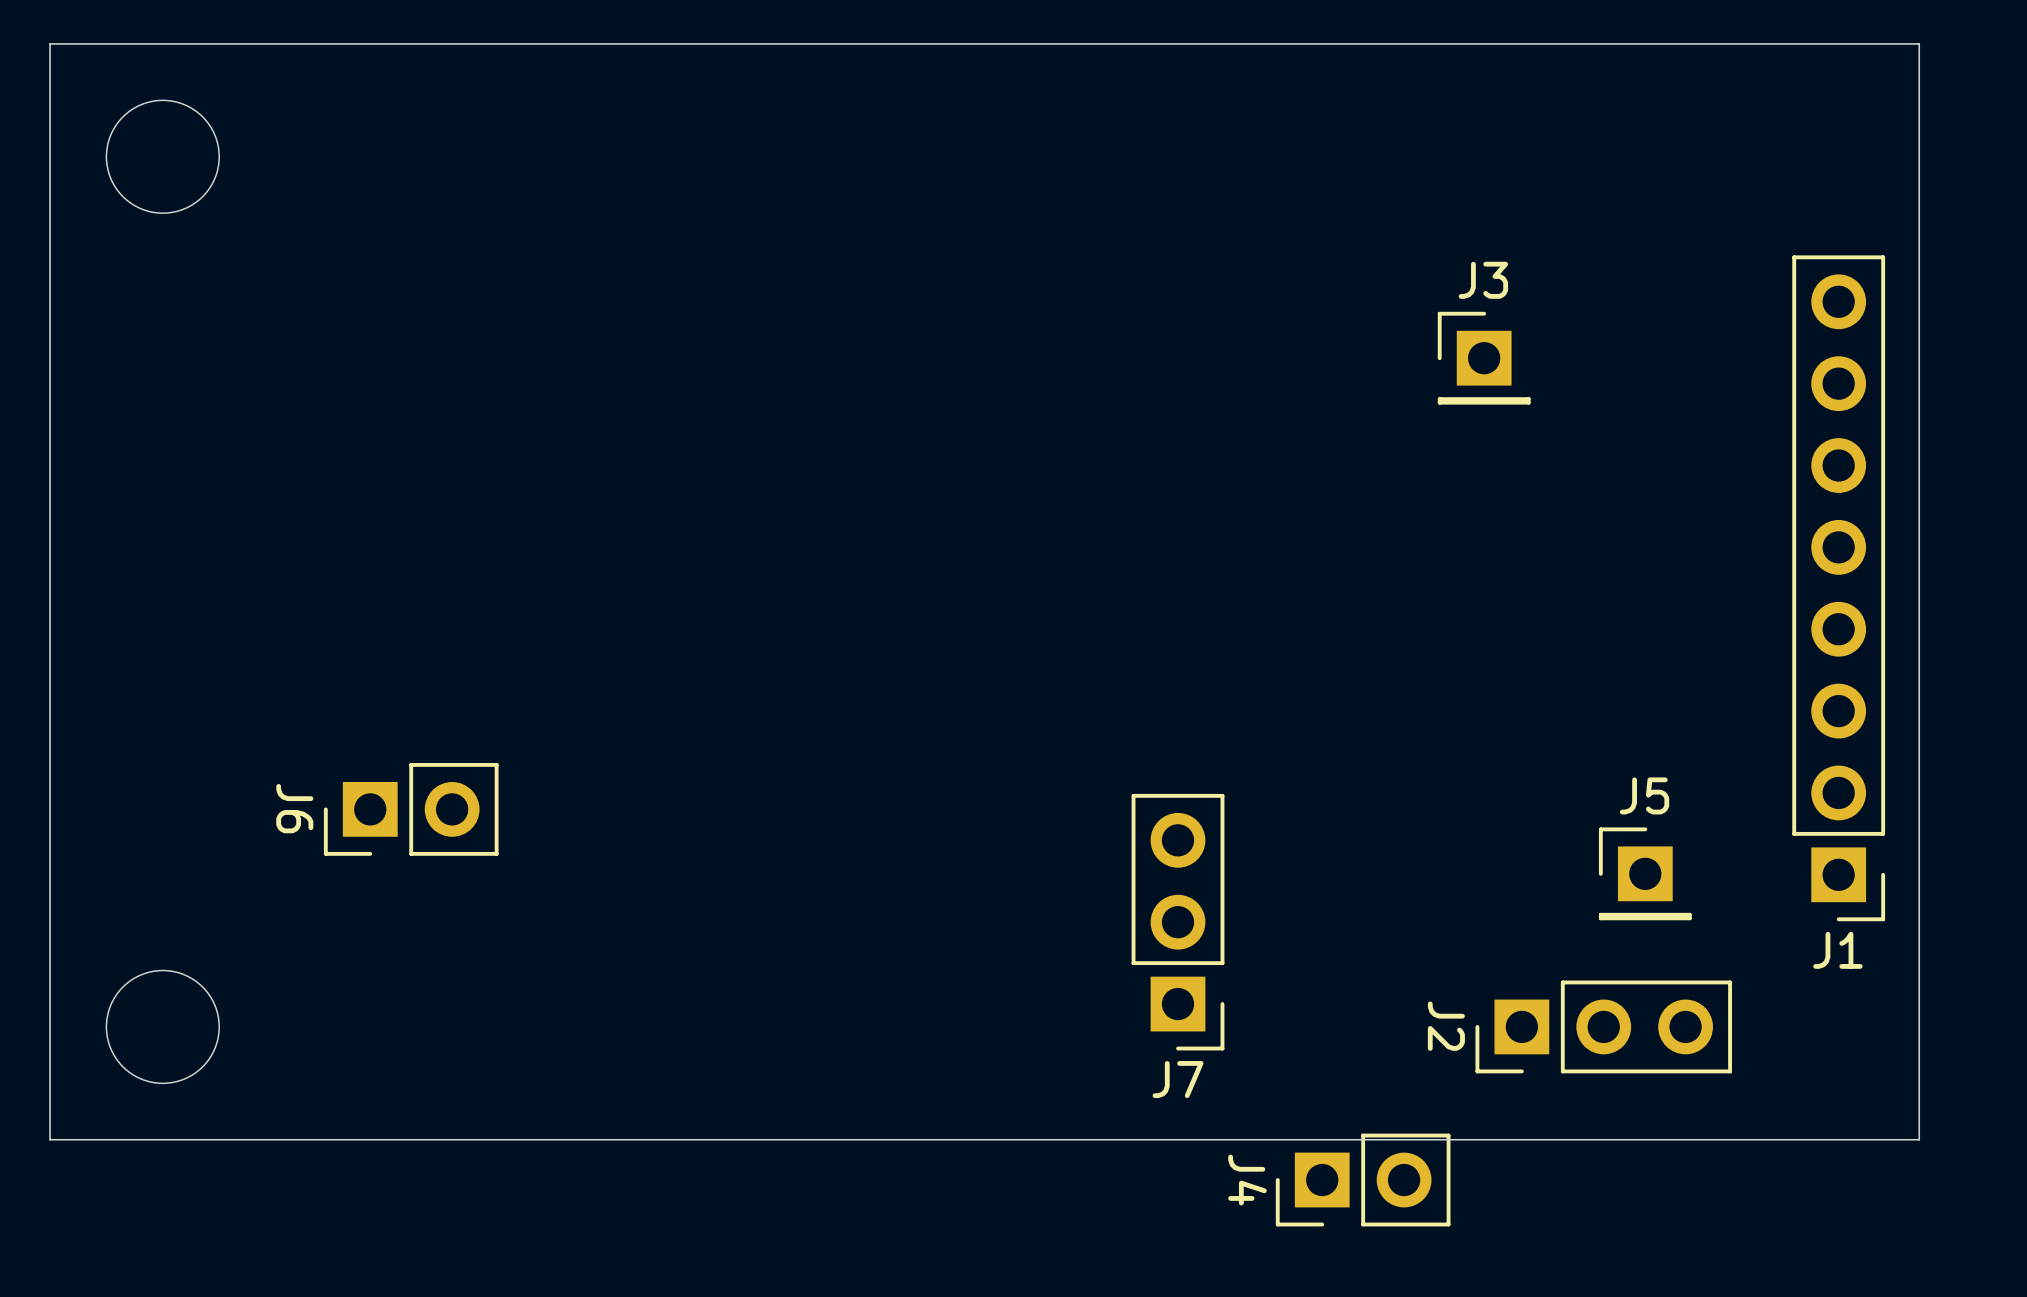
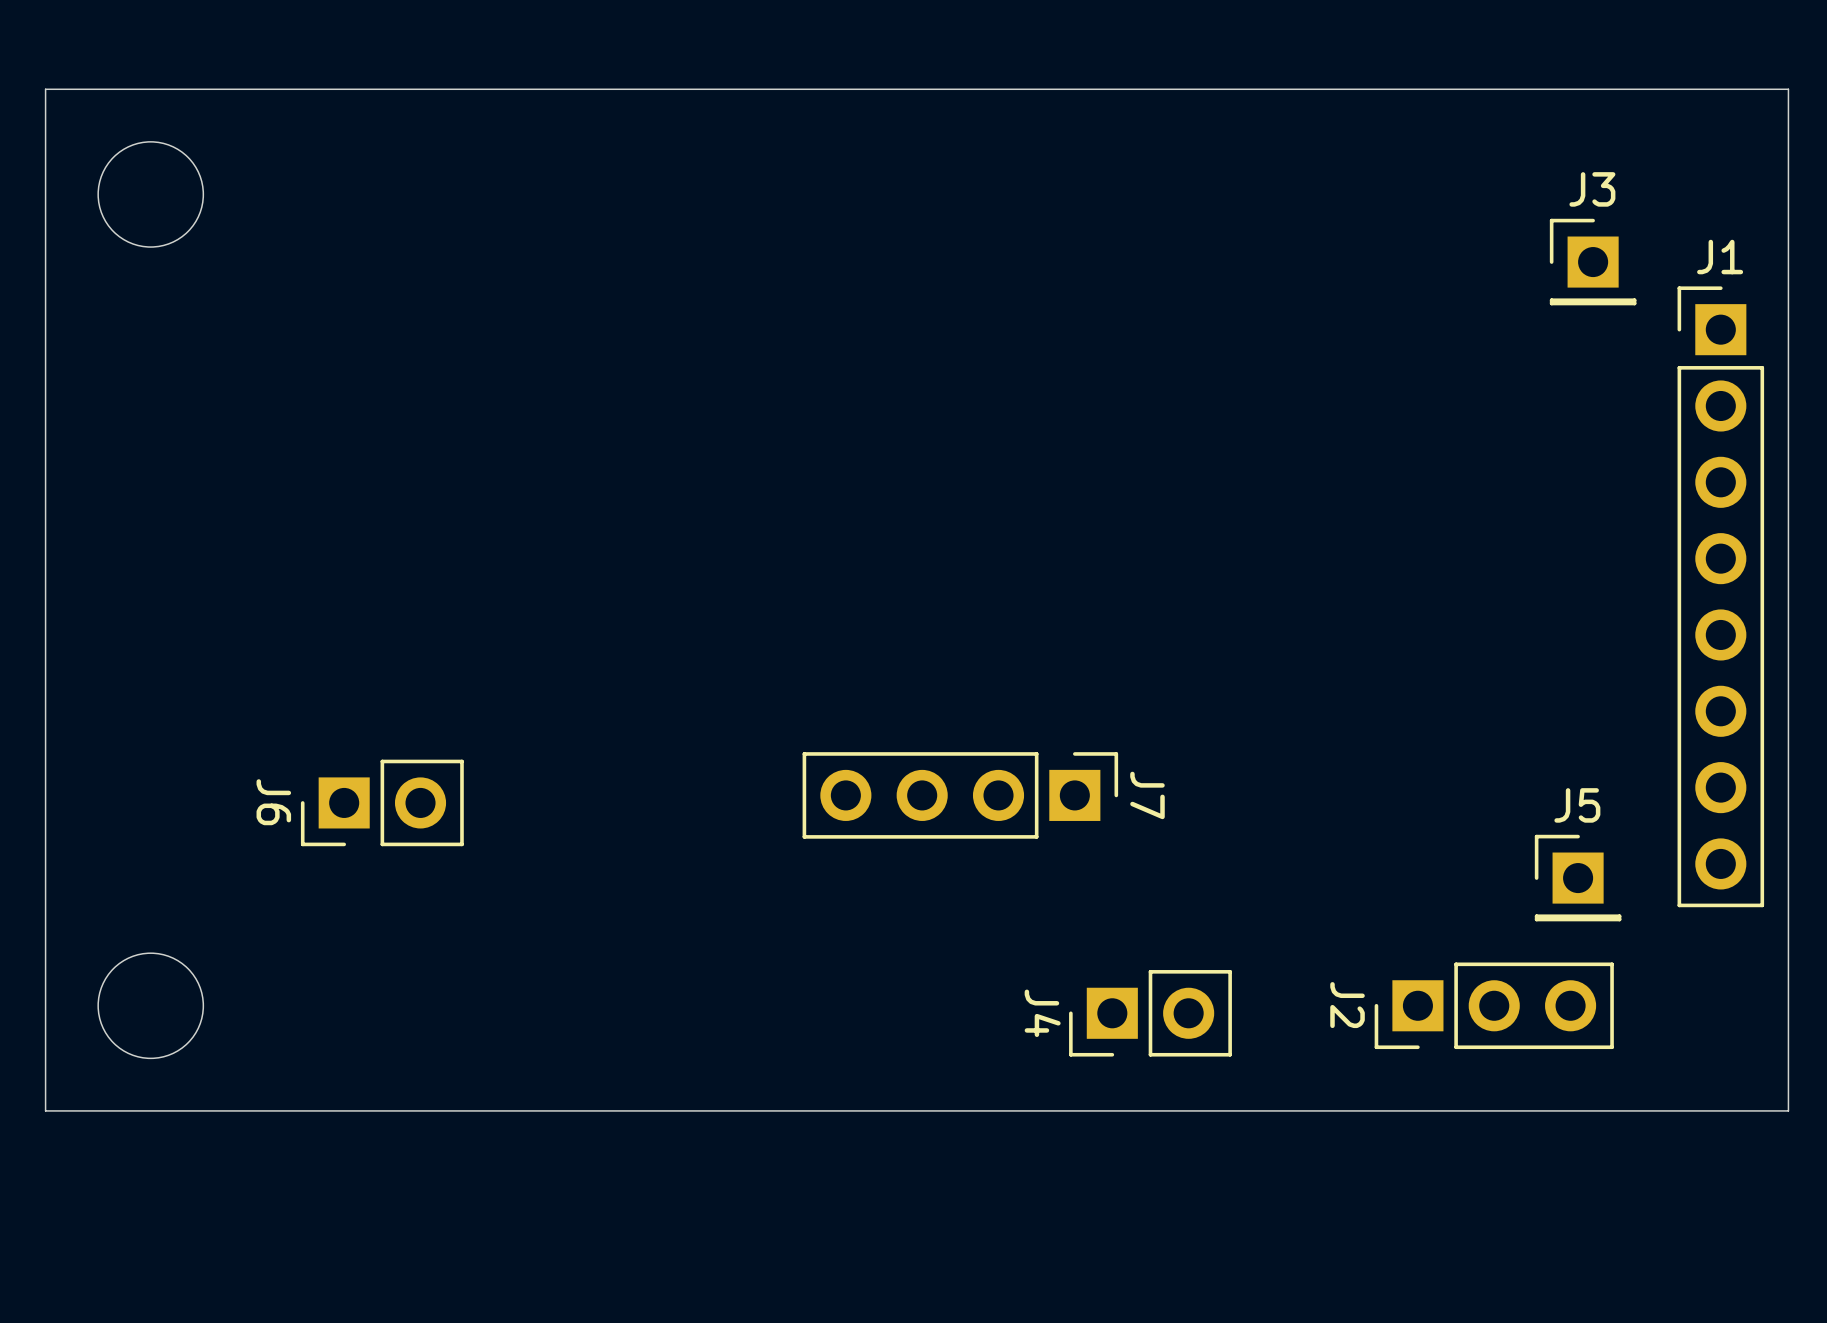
J3 position: (1484, 358) -> (1593, 262)
J1 rotation: 0° (1838, 588) -> 180° (1720, 596)
J7 footprint: [1131, 793, 1225, 1051] -> [802, 752, 1119, 839]
J5 position: (1645, 873) -> (1578, 878)
J7 name position: J7 (1178, 1079) -> J7 (1147, 795)
J4 position: (1363, 1180) -> (1150, 1013)

